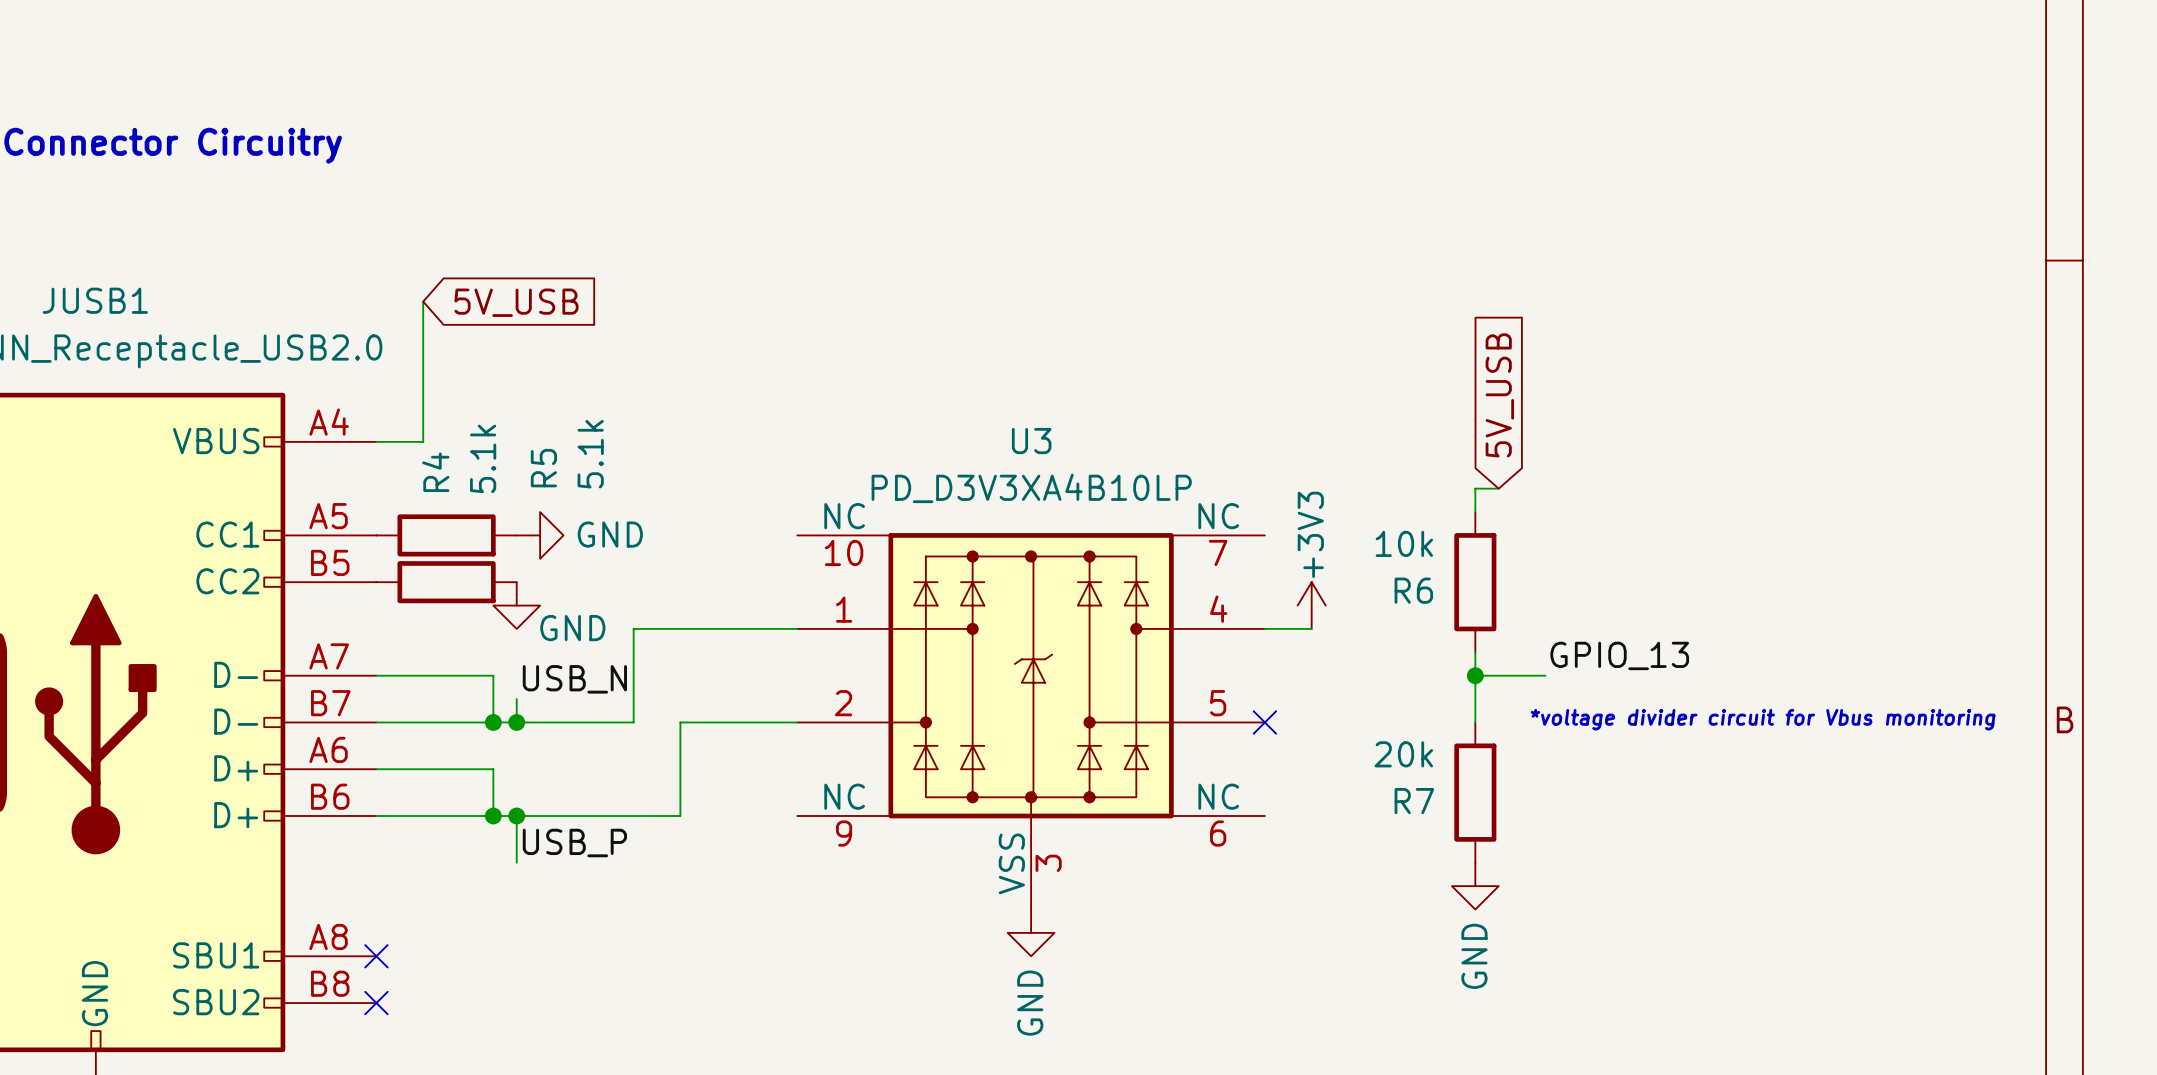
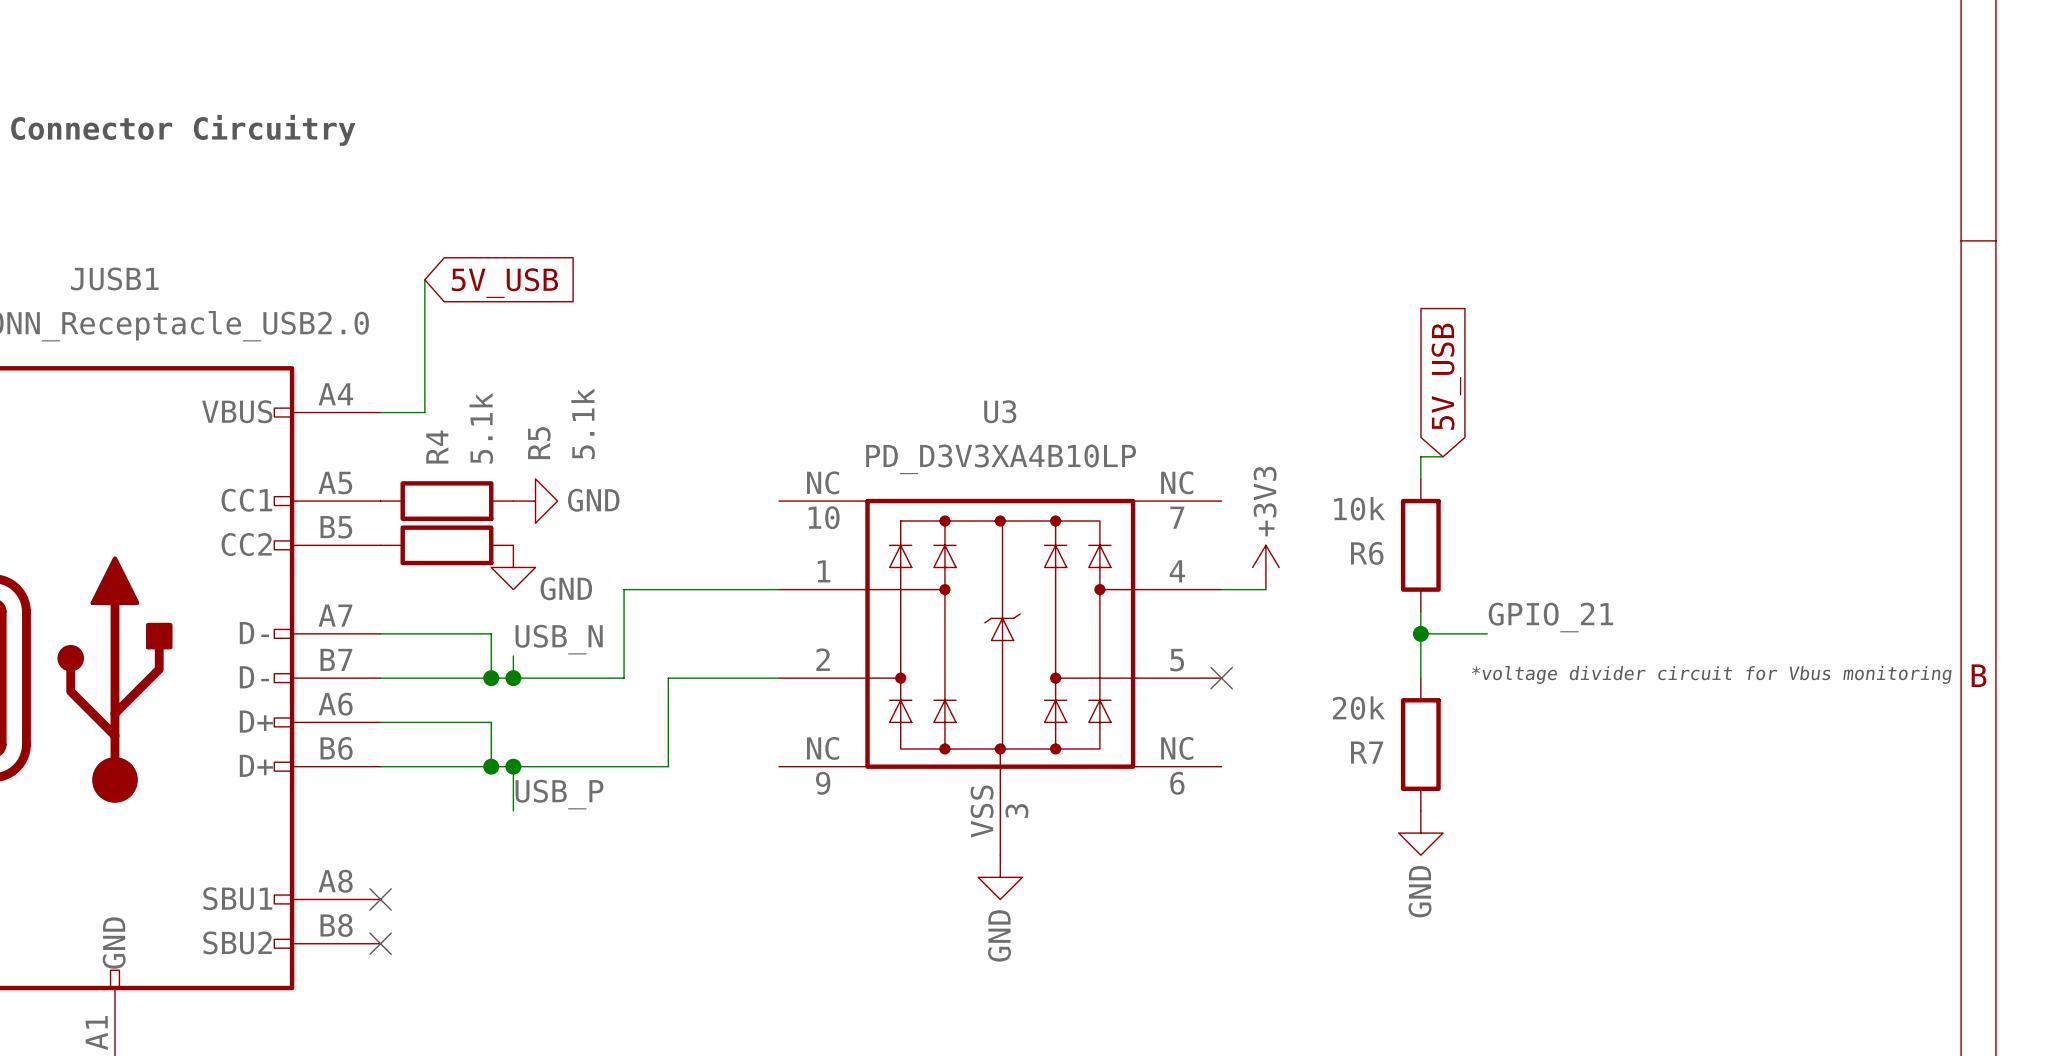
label: GPIO_13 (1619, 655) -> GPIO_21 (1550, 617)

